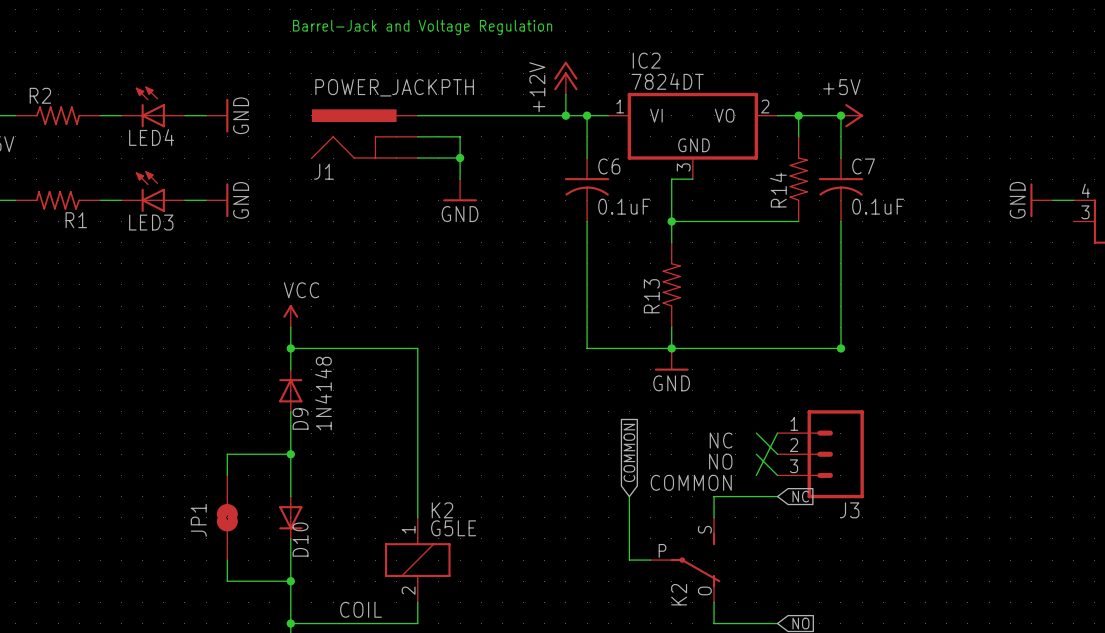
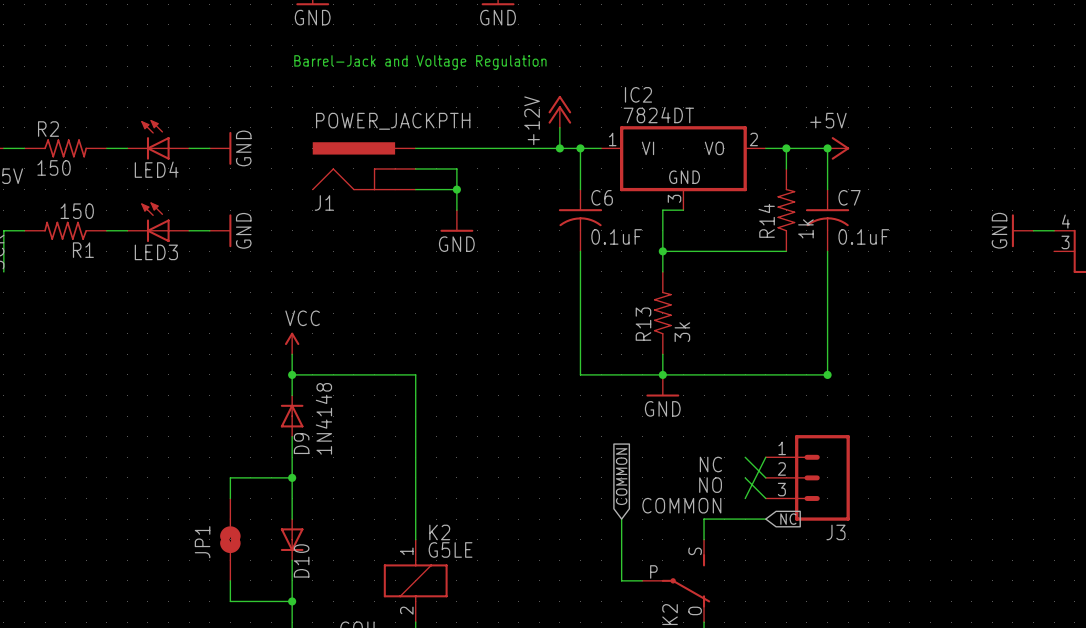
R2 value: none -> 150 (54, 167)
R1 value: none -> 150 (77, 211)
R14 value: none -> 1k (805, 228)
R13 value: none -> 3k (682, 332)

